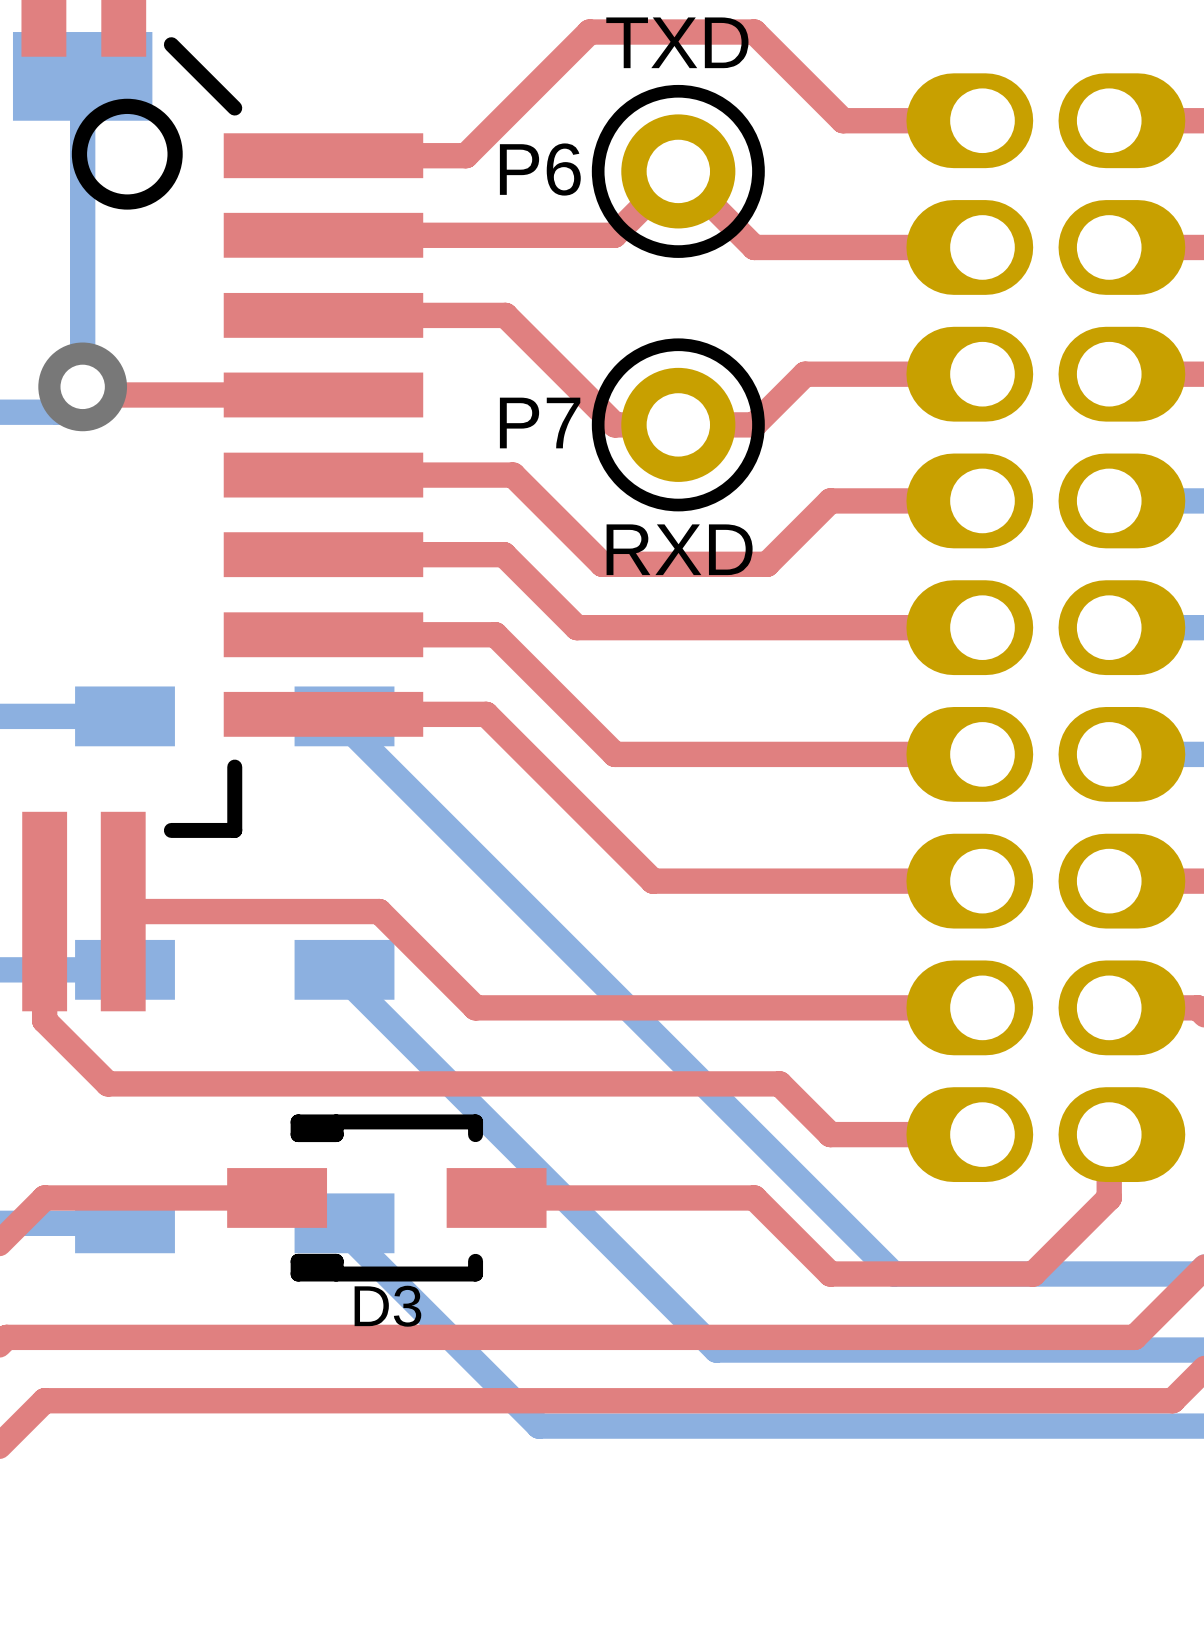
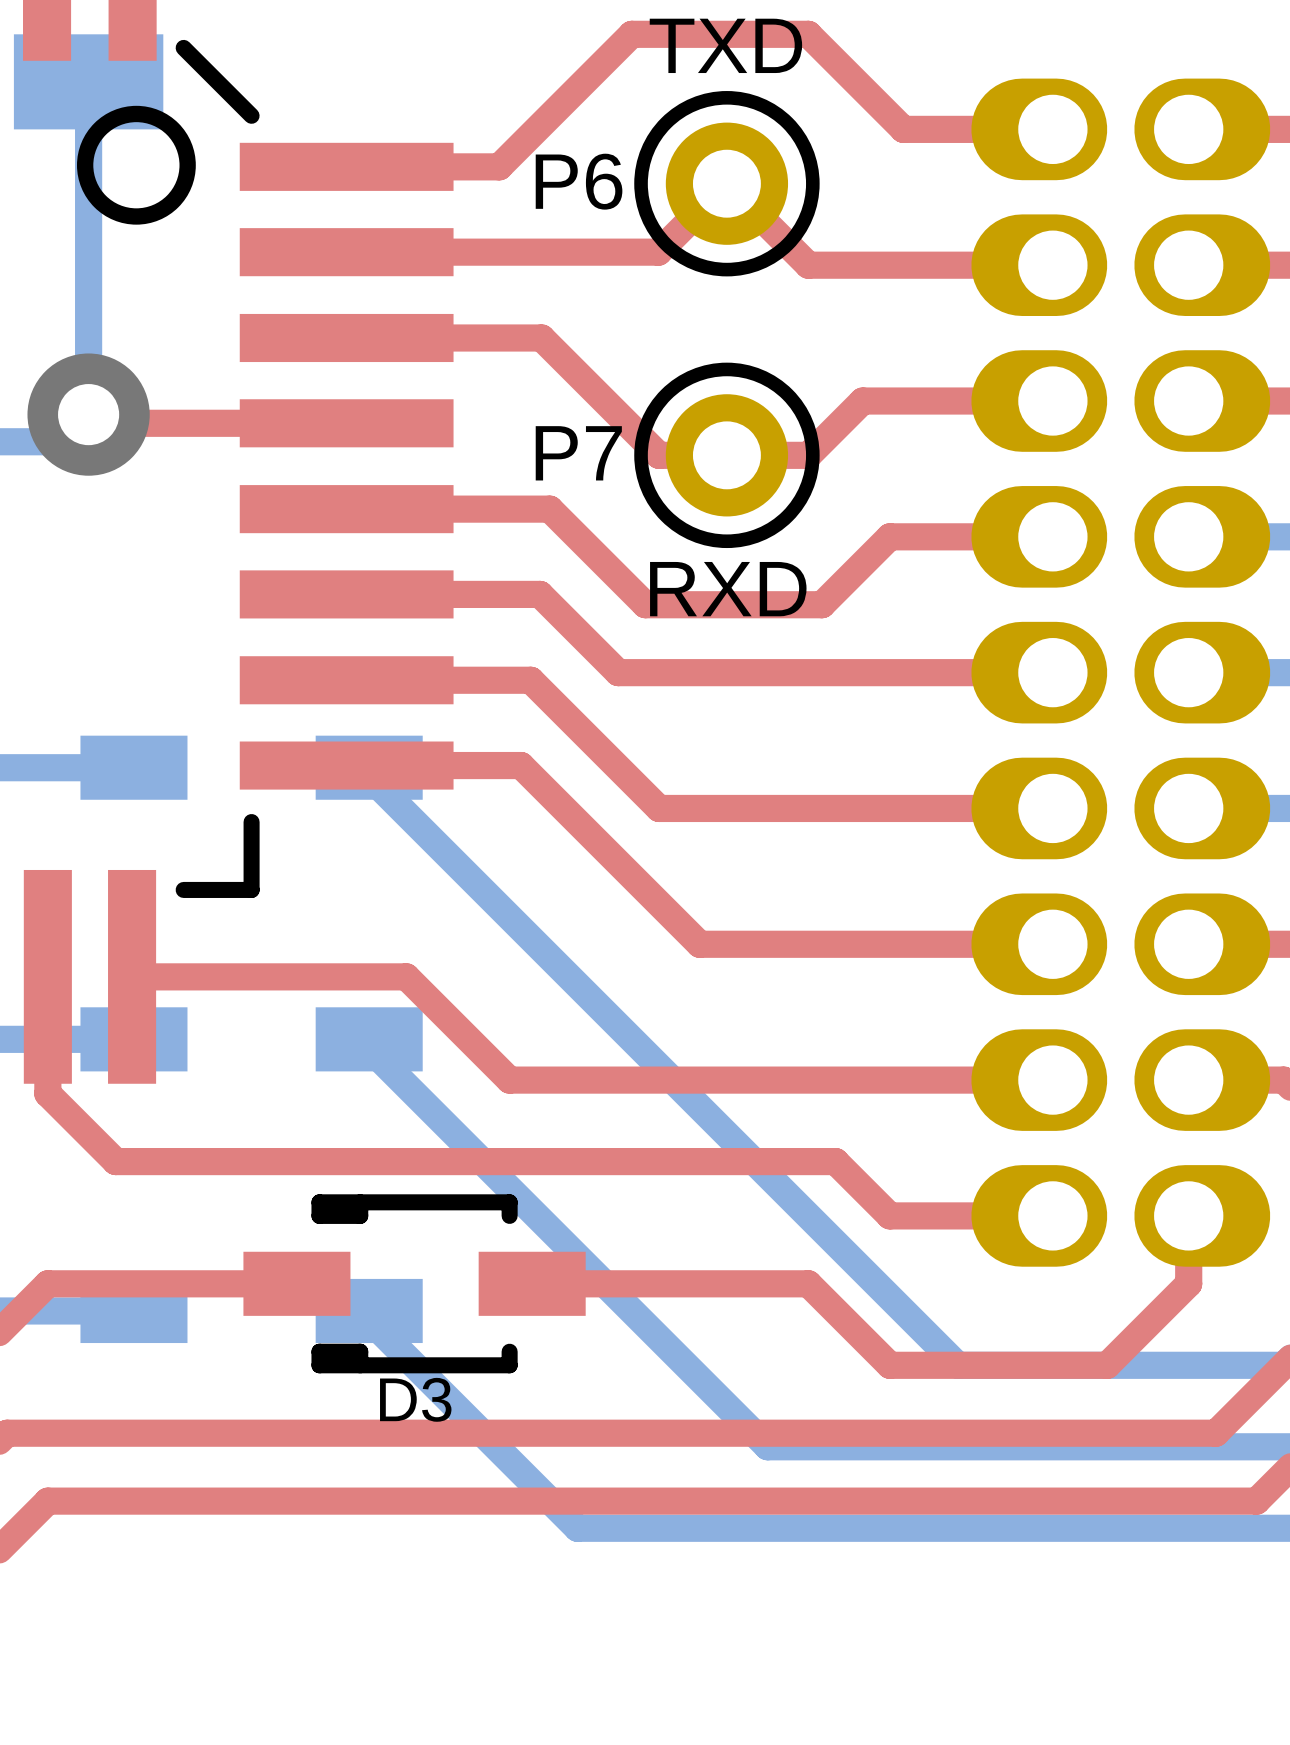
via size: [38, 342, 128, 432] -> [27, 353, 150, 476]

